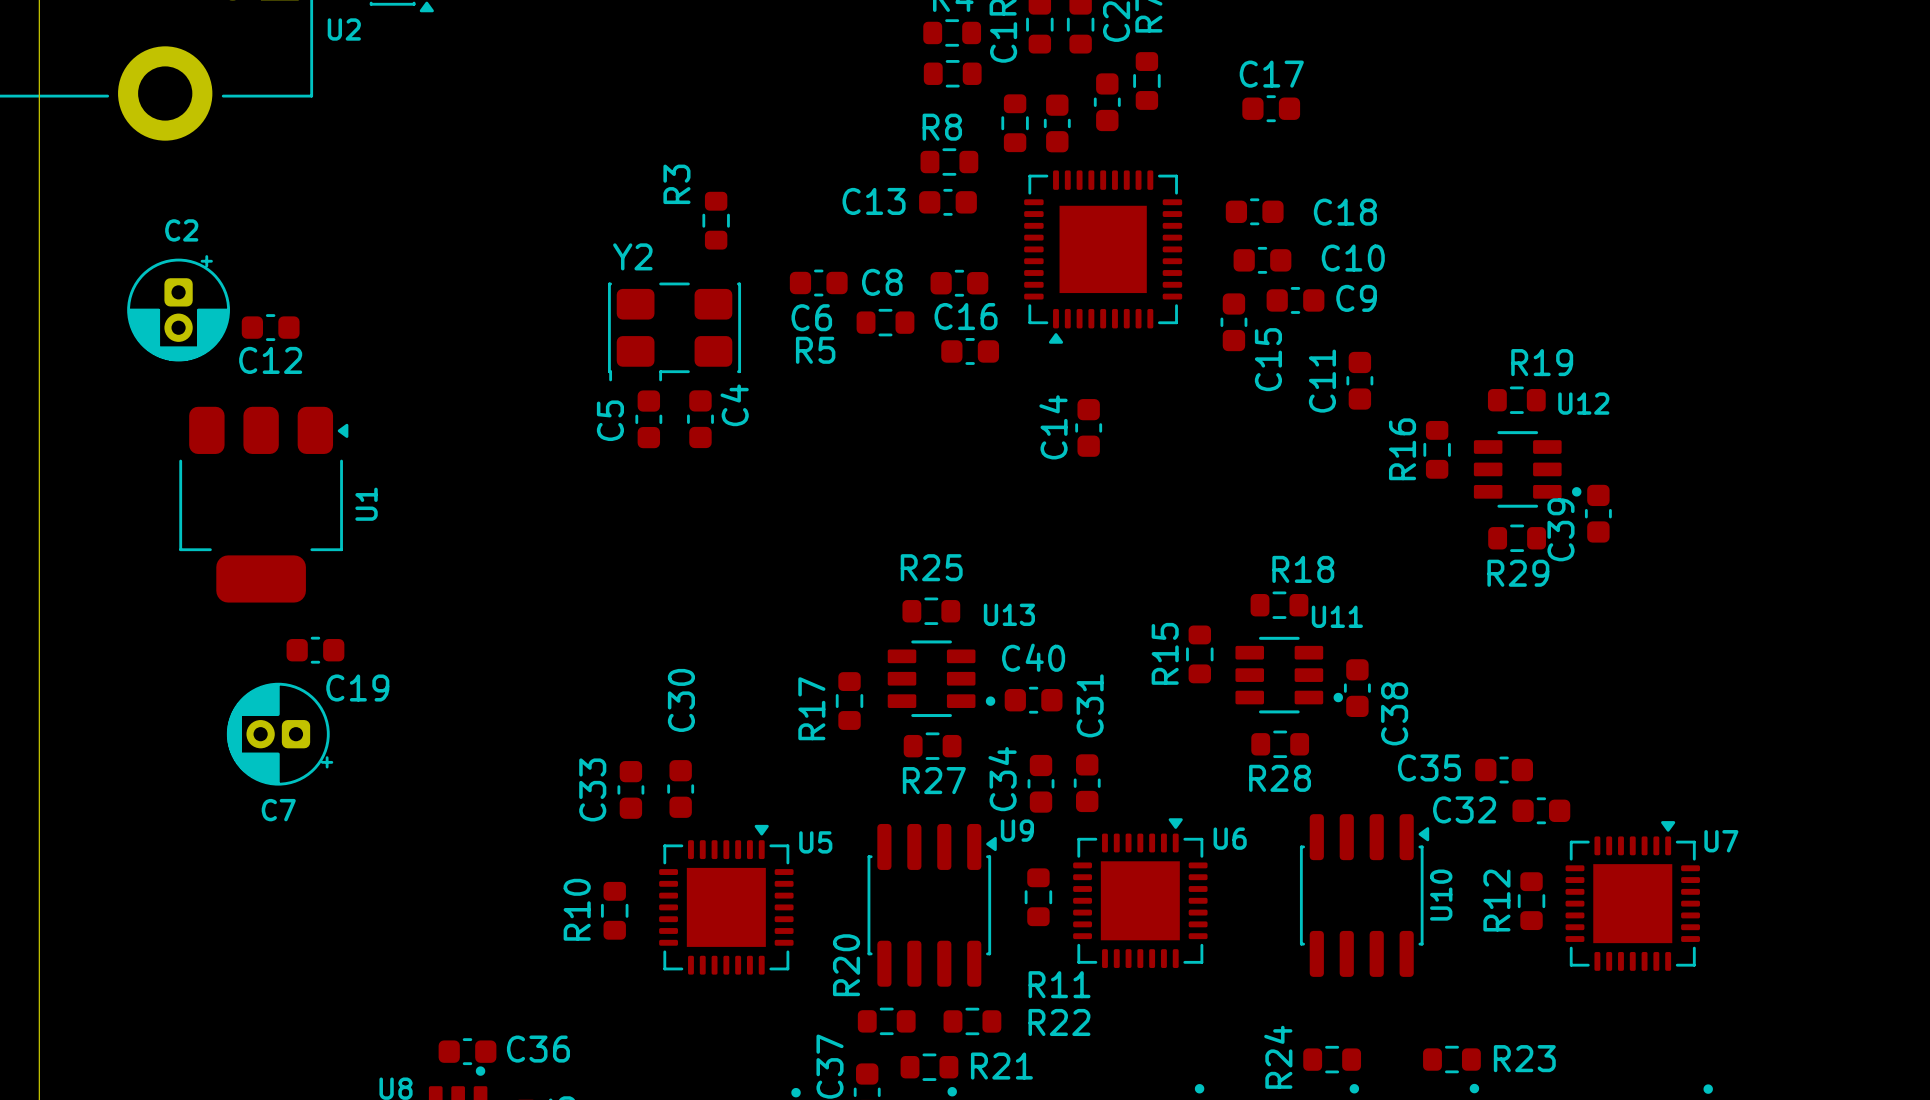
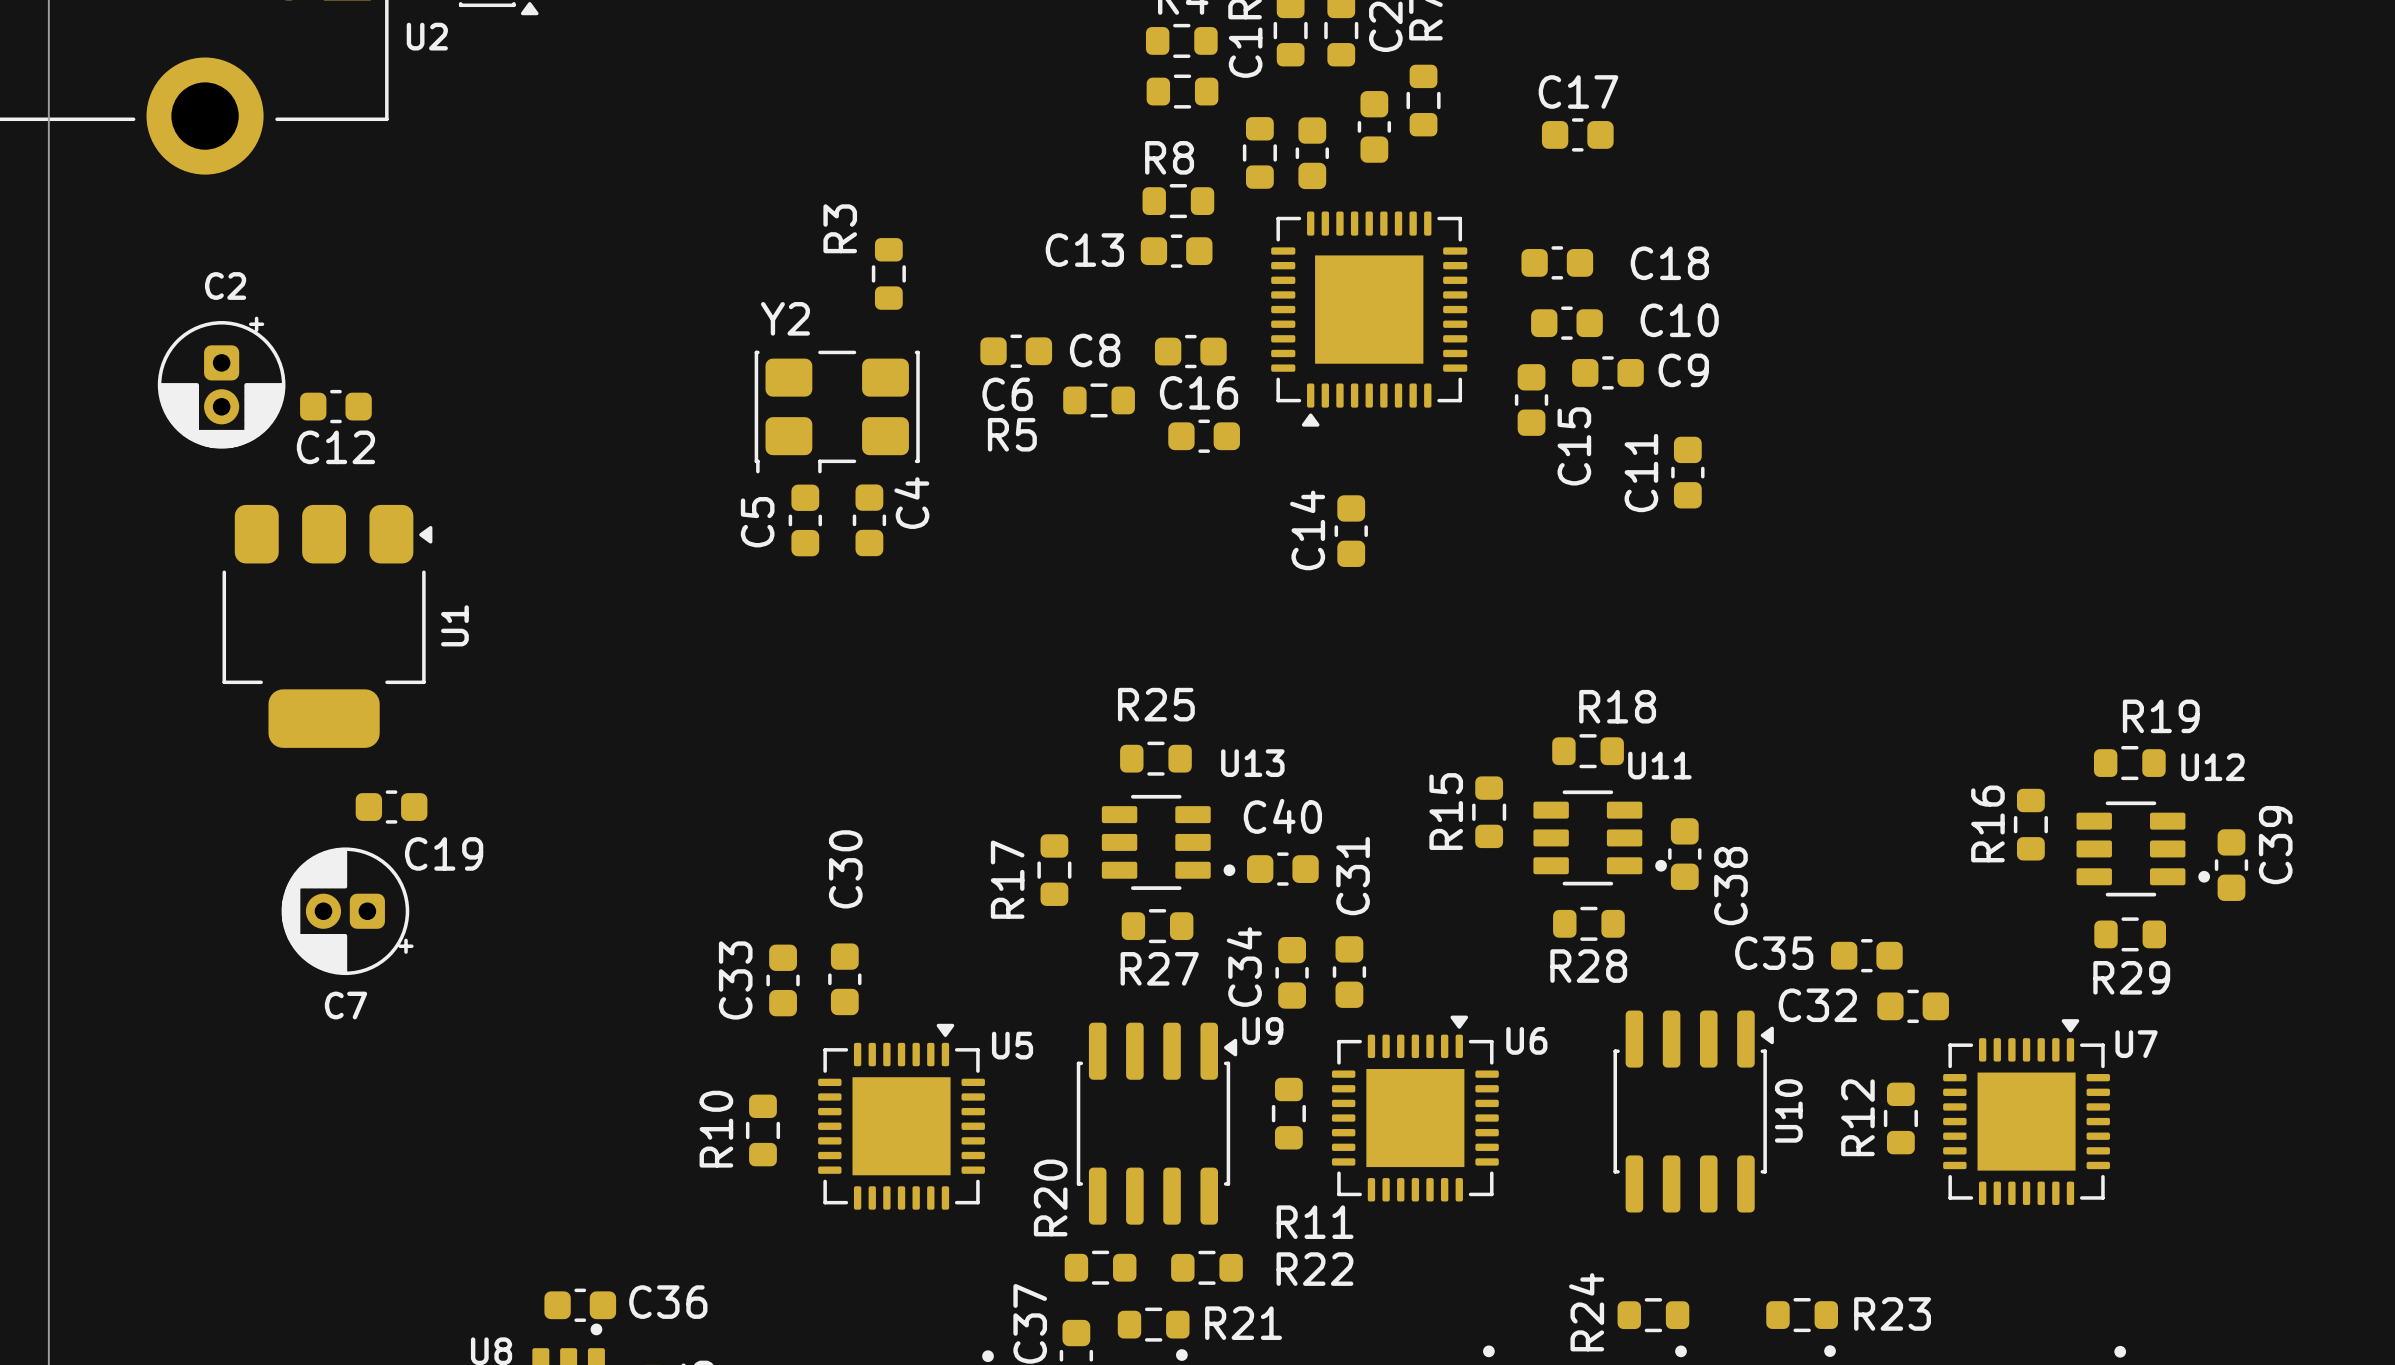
R19 position: (1516, 400) -> (2129, 763)
R16 position: (1437, 449) -> (2030, 824)
U12 position: (1527, 469) -> (2143, 848)
C39 position: (1598, 513) -> (2231, 865)
C39 name position: C39 (1560, 529) -> C39 (2275, 845)
R29 position: (1517, 538) -> (2130, 934)

